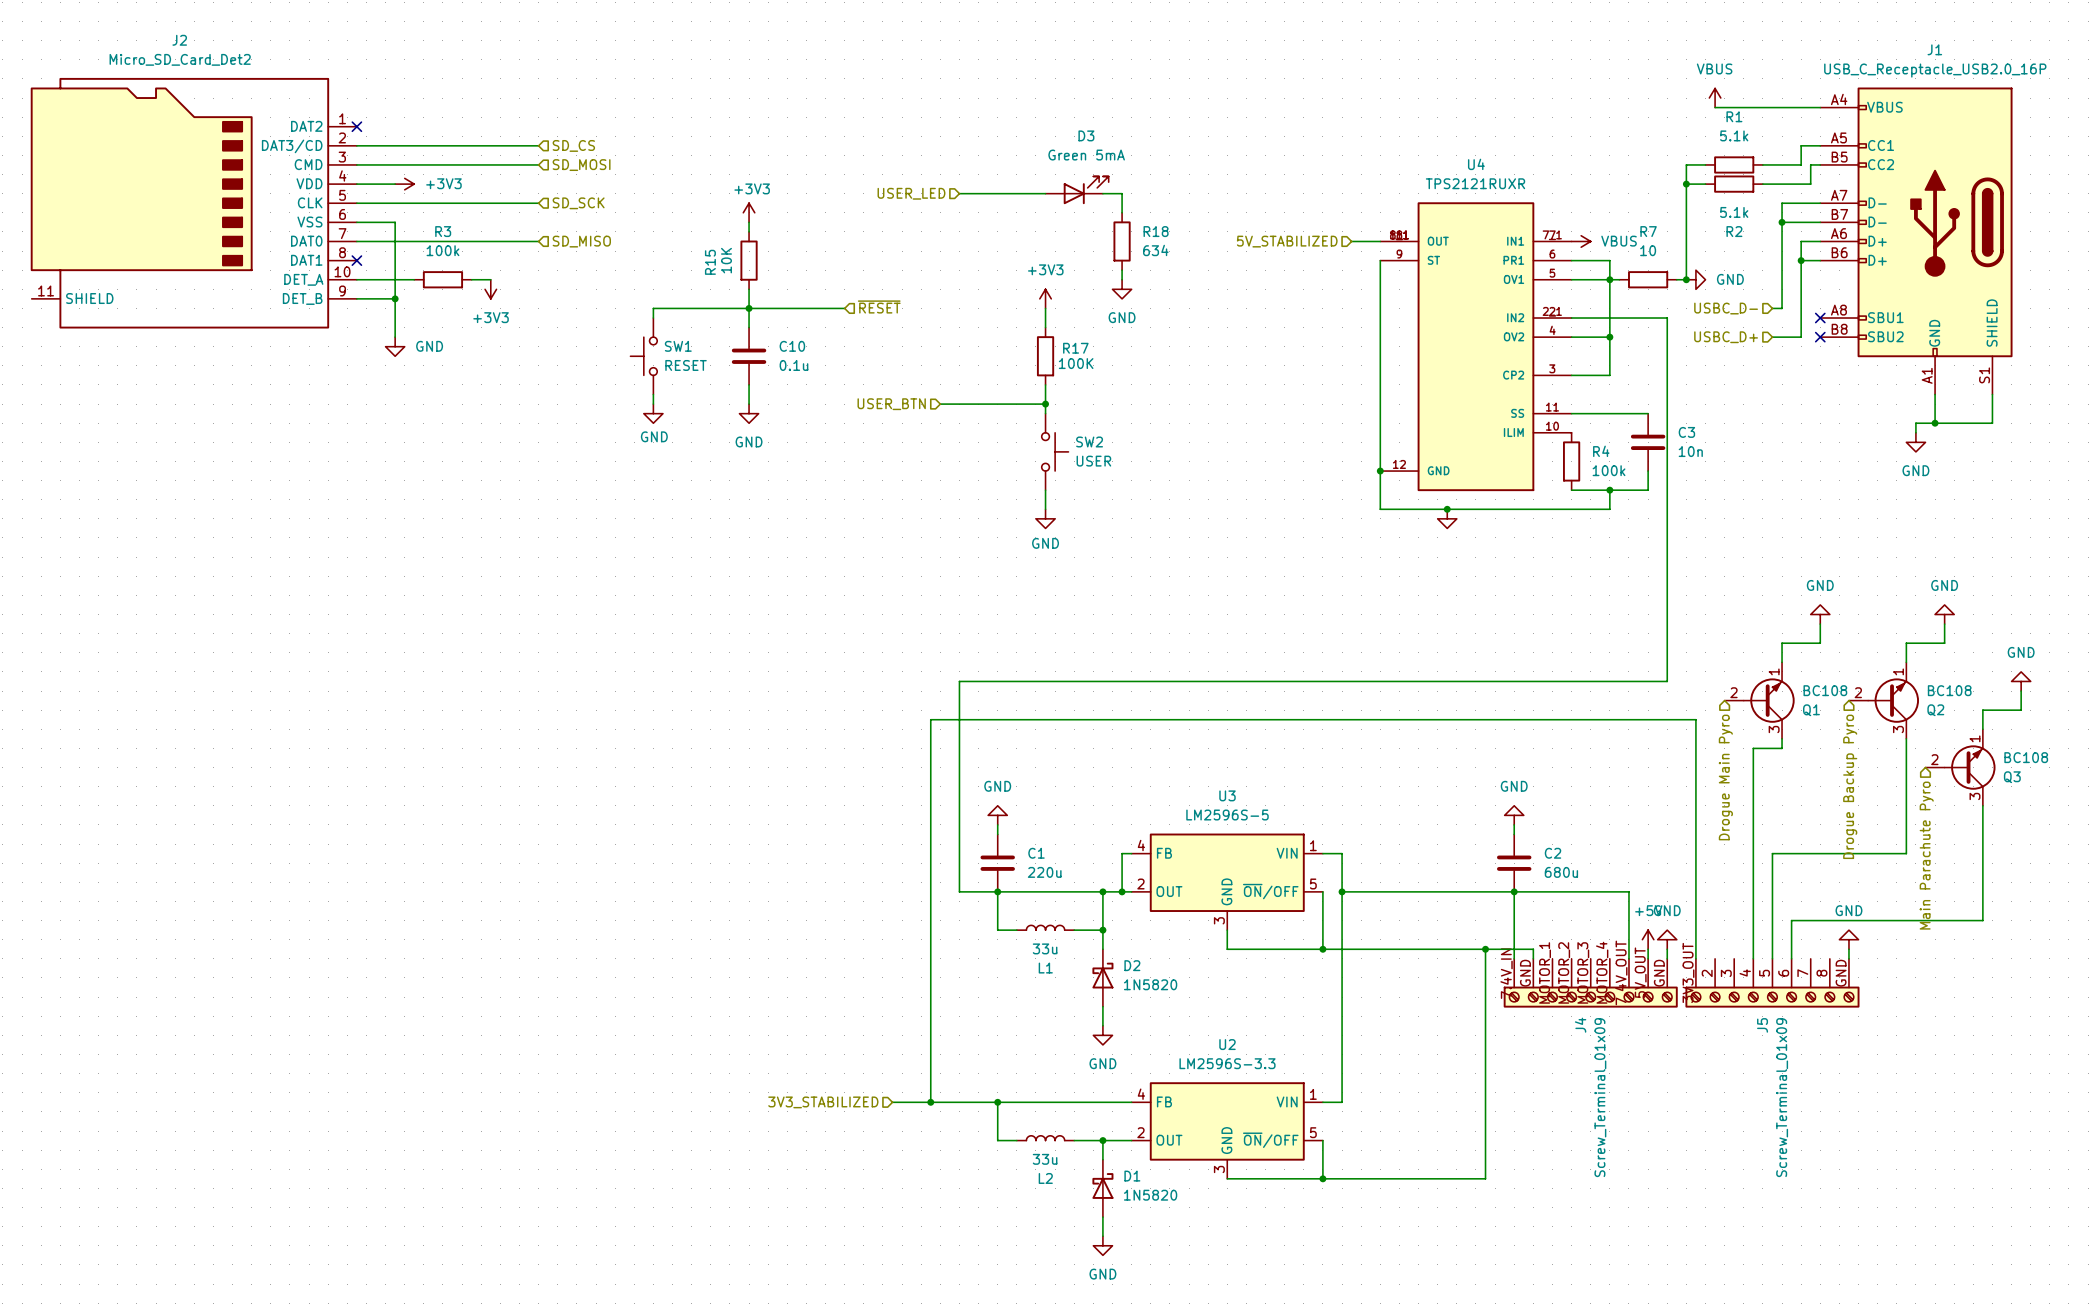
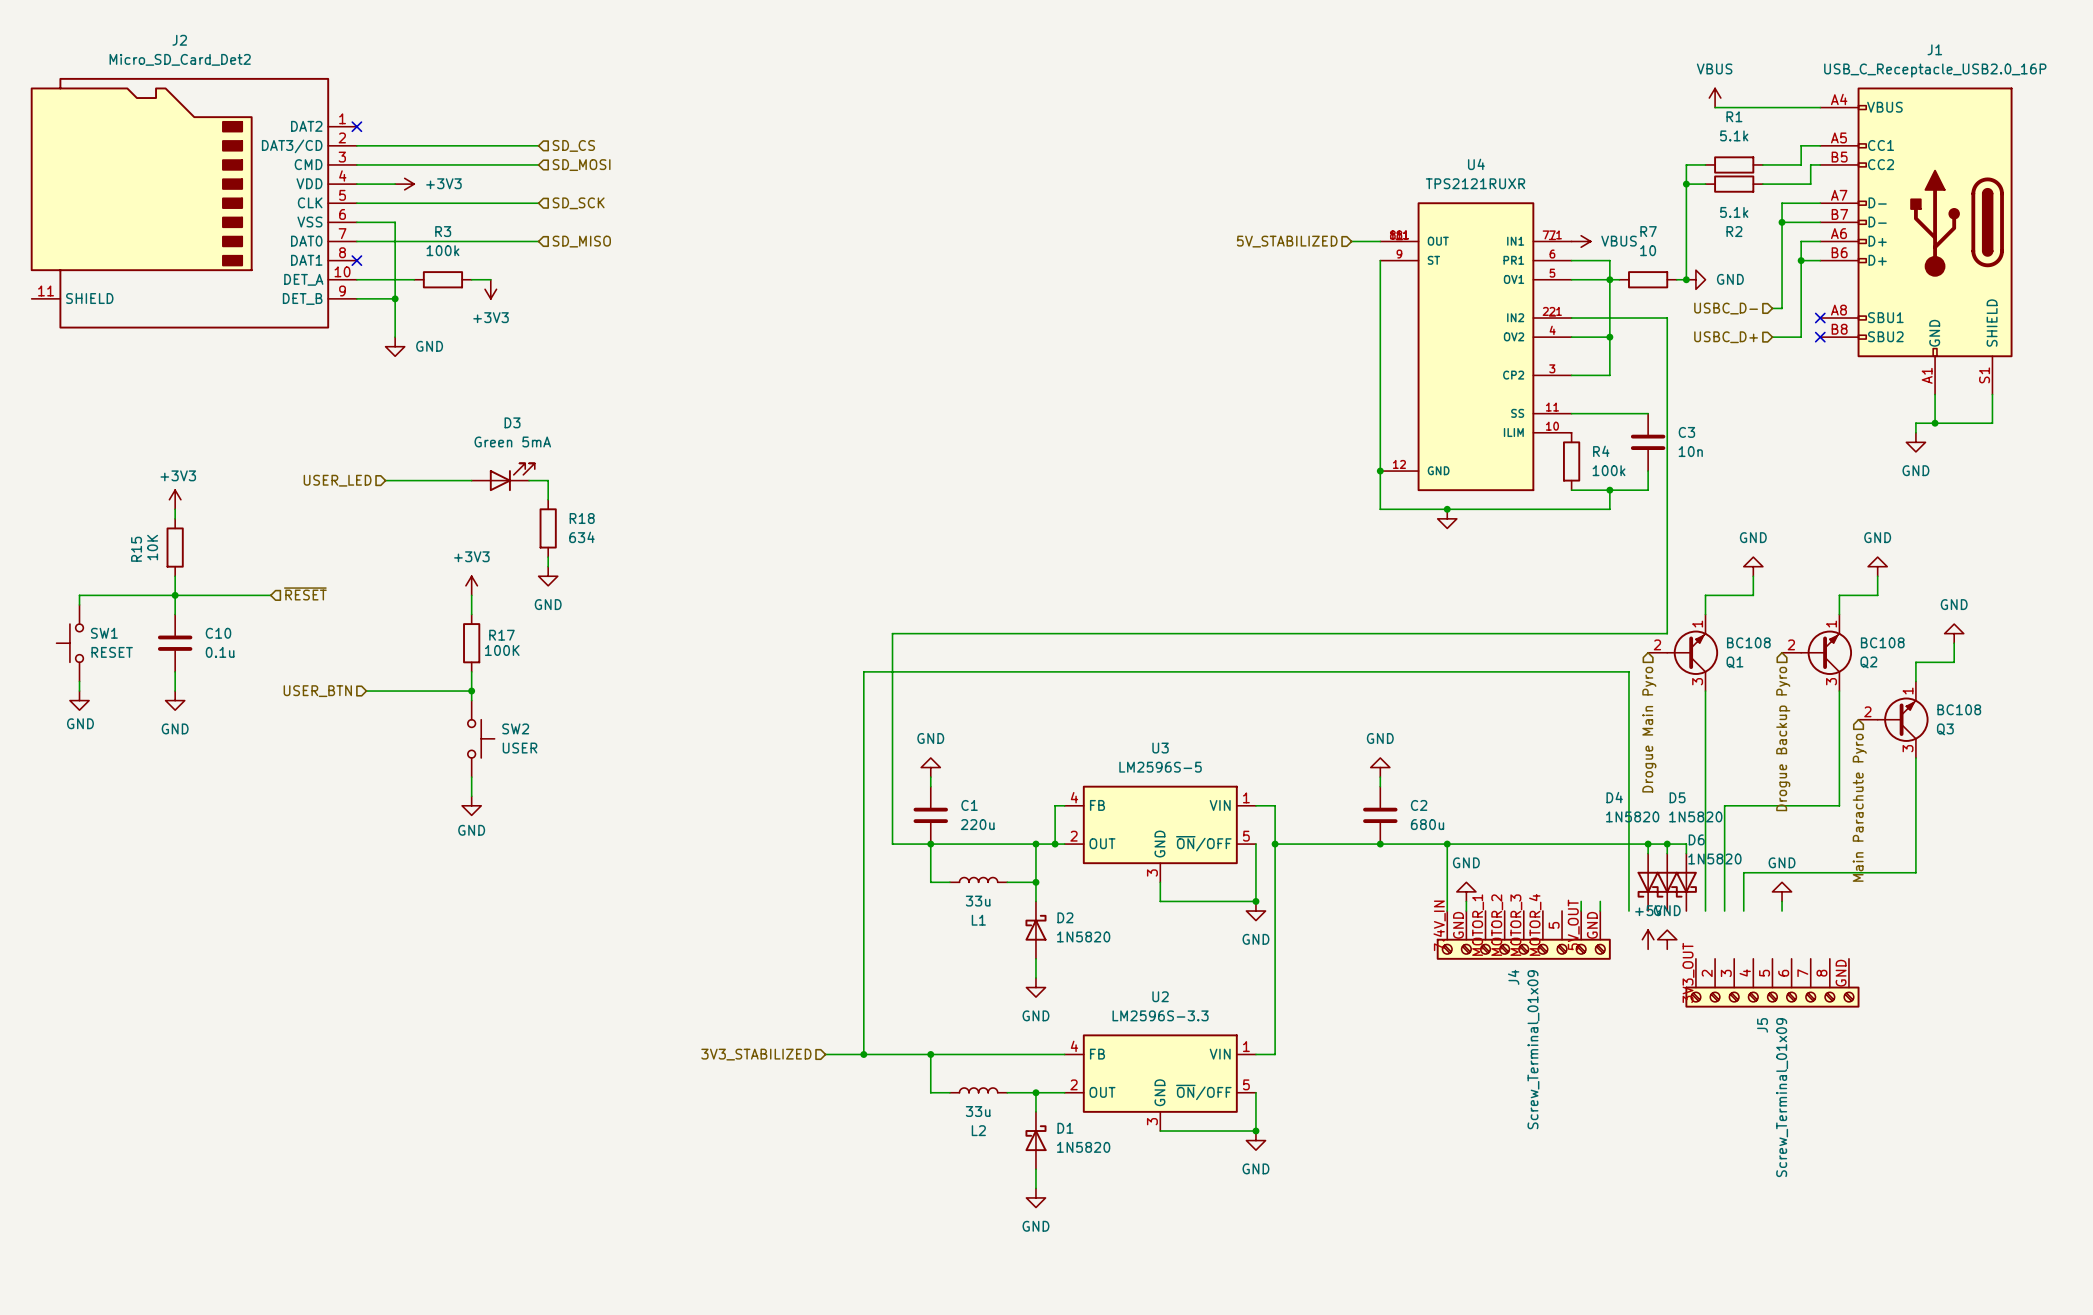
D3 position: (1077, 190) -> (503, 477)
hierarchical label: USER_LED (911, 193) -> none
wire: (959, 193) (1045, 193) -> none
wire: (1102, 193) (1122, 193) (1122, 212) -> none
power symbol: +3V3 (749, 212) -> none
wire: (749, 222) (749, 231) -> none
R18 position: (1122, 241) -> (548, 528)
R15 position: (749, 260) -> (175, 547)
wire: (1122, 270) (1122, 279) -> none
wire: (749, 289) (749, 327) -> none
power symbol: GND (1122, 289) -> none
power symbol: +3V3 (1045, 298) -> none
hierarchical label: ~{RESET} (879, 306) -> none
junction: (749, 308) -> none
wire: (844, 308) (653, 308) (653, 318) -> none
wire: (1045, 308) (1045, 327) -> none
SW1 position: (643, 356) -> (69, 643)
C10 position: (749, 356) -> (175, 643)
R17 position: (1045, 356) -> (471, 643)
wire: (749, 384) (749, 404) -> none
wire: (1045, 384) (1045, 413) -> none
wire: (653, 394) (653, 404) -> none
hierarchical label: USER_BTN (891, 404) -> none
wire: (940, 404) (1045, 404) -> none
junction: (1045, 404) -> none
power symbol: GND (653, 413) -> none
power symbol: GND (749, 413) -> none
SW2 position: (1055, 451) -> (481, 738)
hierarchical label: none -> USER_LED (337, 480)
wire: none -> (385, 480) (471, 480)
wire: none -> (529, 480) (548, 480) (548, 499)
wire: (1045, 490) (1045, 509) -> none
power symbol: none -> +3V3 (175, 499)
wire: none -> (175, 509) (175, 518)
power symbol: GND (1045, 518) -> none
wire: none -> (548, 557) (548, 566)
power symbol: none -> GND (1753, 566)
power symbol: none -> GND (1877, 566)
wire: none -> (175, 576) (175, 614)
power symbol: none -> GND (548, 576)
wire: none -> (1753, 576) (1753, 595) (1705, 595) (1705, 614)
power symbol: none -> +3V3 (471, 585)
hierarchical label: none -> ~{RESET} (305, 593)
junction: none -> (175, 595)
wire: none -> (270, 595) (79, 595) (79, 604)
wire: none -> (471, 595) (471, 614)
power symbol: GND (1820, 614) -> none
power symbol position: GND (1944, 614) -> GND (1954, 633)
wire: (1820, 624) (1820, 643) (1782, 643) (1782, 662) -> none
wire: (1944, 624) (1944, 643) (1906, 643) (1906, 662) -> (1877, 576) (1877, 595) (1839, 595) (1839, 614)
wire: (1667, 633) (1667, 681) (959, 681) (959, 891) (1131, 891) -> (1667, 633) (892, 633) (892, 844) (1064, 844)
wire: none -> (175, 671) (175, 691)
wire: none -> (471, 671) (471, 700)
wire: none -> (79, 681) (79, 691)
power symbol: GND (2021, 681) -> none
hierarchical label: none -> USER_BTN (317, 691)
wire: none -> (366, 691) (471, 691)
junction: none -> (471, 691)
wire: none -> (1705, 691) (1705, 911)
wire: none -> (1839, 691) (1839, 805) (1724, 805) (1724, 911)
wire: (2021, 691) (2021, 710) (1982, 710) (1982, 729) -> (1954, 643) (1954, 662) (1915, 662) (1915, 681)
power symbol: none -> GND (79, 700)
power symbol: none -> GND (175, 700)
Q1 position: (1759, 700) -> (1683, 652)
Q2 position: (1883, 700) -> (1817, 652)
wire: (1782, 738) (1782, 748) (1753, 748) (1753, 958) -> none
wire: (1906, 738) (1906, 853) (1772, 853) (1772, 958) -> none
wire: none -> (1915, 757) (1915, 872) (1743, 872) (1743, 911)
power symbol: none -> GND (1380, 767)
Q3 position: (1960, 767) -> (1893, 719)
wire: none -> (471, 777) (471, 796)
wire: (930, 777) (930, 719) (1695, 719) (1695, 958) -> none
wire: none -> (1380, 777) (1380, 786)
hierarchical label position: Drogue Main Pyro (1725, 777) -> Drogue Main Pyro (1649, 729)
hierarchical label position: Drogue Backup Pyro (1850, 786) -> Drogue Backup Pyro (1783, 739)
power symbol: none -> GND (471, 805)
wire: (1982, 805) (1982, 920) (1791, 920) (1791, 958) -> none
power symbol position: GND (997, 815) -> GND (930, 767)
power symbol: GND (1514, 815) -> none
wire: (997, 824) (997, 834) -> none
wire: (1514, 824) (1514, 834) -> (1648, 844) (1648, 853)
junction: none -> (930, 844)
junction: none -> (1035, 844)
junction: none -> (1055, 844)
wire: none -> (1275, 844) (1686, 844) (1686, 853)
junction: none -> (1275, 844)
junction: none -> (1380, 844)
junction: none -> (1447, 844)
junction: none -> (1648, 844)
wire: none -> (1667, 844) (1667, 853)
junction: none -> (1667, 844)
wire: (1131, 853) (1122, 853) (1122, 891) -> (1064, 805) (1055, 805) (1055, 844)
wire: (1322, 853) (1342, 853) (1342, 1102) (1322, 1102) -> (1255, 805) (1275, 805) (1275, 1054) (1255, 1054)
hierarchical label position: Main Parachute Pyro (1926, 855) -> Main Parachute Pyro (1859, 807)
C1 position: (997, 863) -> (930, 815)
C2 position: (1514, 863) -> (1380, 815)
U3 position: (1227, 881) -> (1160, 834)
wire: (930, 882) (930, 1054) -> (930, 882) (949, 882)
junction: none -> (1035, 882)
D4: none -> 1N5820 (1648, 882)
D5: none -> 1N5820 (1667, 882)
D6: none -> 1N5820 (1686, 882)
wire: (997, 891) (997, 930) (1016, 930) -> none
junction: (997, 891) -> none
wire: (1102, 891) (1102, 949) -> (1035, 844) (1035, 901)
junction: (1102, 891) -> none
junction: (1122, 891) -> none
wire: (1322, 891) (1322, 949) -> none
wire: (1342, 891) (1628, 891) -> (863, 1054) (863, 671) (1628, 671) (1628, 891)
junction: (1342, 891) -> none
power symbol: none -> GND (1466, 891)
wire: (1514, 891) (1514, 958) -> (1447, 844) (1447, 911)
junction: (1514, 891) -> none
junction: none -> (1255, 901)
wire: none -> (1466, 901) (1466, 911)
power symbol: none -> GND (1255, 911)
wire: (1628, 911) (1628, 958) -> none
L1 position: (1045, 927) -> (978, 879)
wire: (1074, 930) (1102, 930) -> (1007, 882) (1035, 882)
junction: (1102, 930) -> none
wire: (1227, 930) (1227, 949) (1533, 949) (1533, 958) -> none
power symbol position: GND (1848, 939) -> GND (1782, 891)
junction: (1322, 949) -> none
wire: (1485, 949) (1485, 1178) (1227, 1178) -> none
junction: (1485, 949) -> none
wire: (1648, 949) (1648, 958) -> (1581, 901) (1581, 911)
wire: (1667, 949) (1667, 958) -> (1600, 901) (1600, 911)
wire: (1848, 949) (1848, 958) -> (1782, 901) (1782, 911)
J4 pin number: 7.4V_OUT (1621, 972) -> 5 (1554, 925)
D2 position: (1102, 977) -> (1035, 930)
J4 position: (1590, 983) -> (1523, 935)
wire: (1102, 1006) (1102, 1025) -> (1035, 958) (1035, 977)
power symbol position: GND (1102, 1035) -> GND (1035, 987)
junction: none -> (863, 1054)
junction: none -> (930, 1054)
wire: (930, 1092) (930, 1102) -> (930, 1092) (949, 1092)
hierarchical label position: 3V3_STABILIZED (823, 1102) -> 3V3_STABILIZED (756, 1054)
wire: (892, 1102) (1131, 1102) -> (825, 1054) (1064, 1054)
junction: (930, 1102) -> none
wire: (997, 1102) (997, 1140) (1016, 1140) -> none
junction position: (997, 1102) -> (1035, 1092)
U2 position: (1227, 1130) -> (1160, 1082)
junction: none -> (1255, 1131)
L2 position: (1045, 1138) -> (978, 1090)
wire: (1074, 1140) (1131, 1140) -> (1007, 1092) (1064, 1092)
wire: (1102, 1140) (1102, 1159) -> (1035, 1092) (1035, 1111)
junction: (1102, 1140) -> none
power symbol: none -> GND (1255, 1140)
wire: (1322, 1140) (1322, 1178) -> none
junction: (1322, 1178) -> none
D1 position: (1102, 1188) -> (1035, 1140)
wire: (1102, 1217) (1102, 1236) -> (1035, 1169) (1035, 1188)
power symbol position: GND (1102, 1245) -> GND (1035, 1197)

